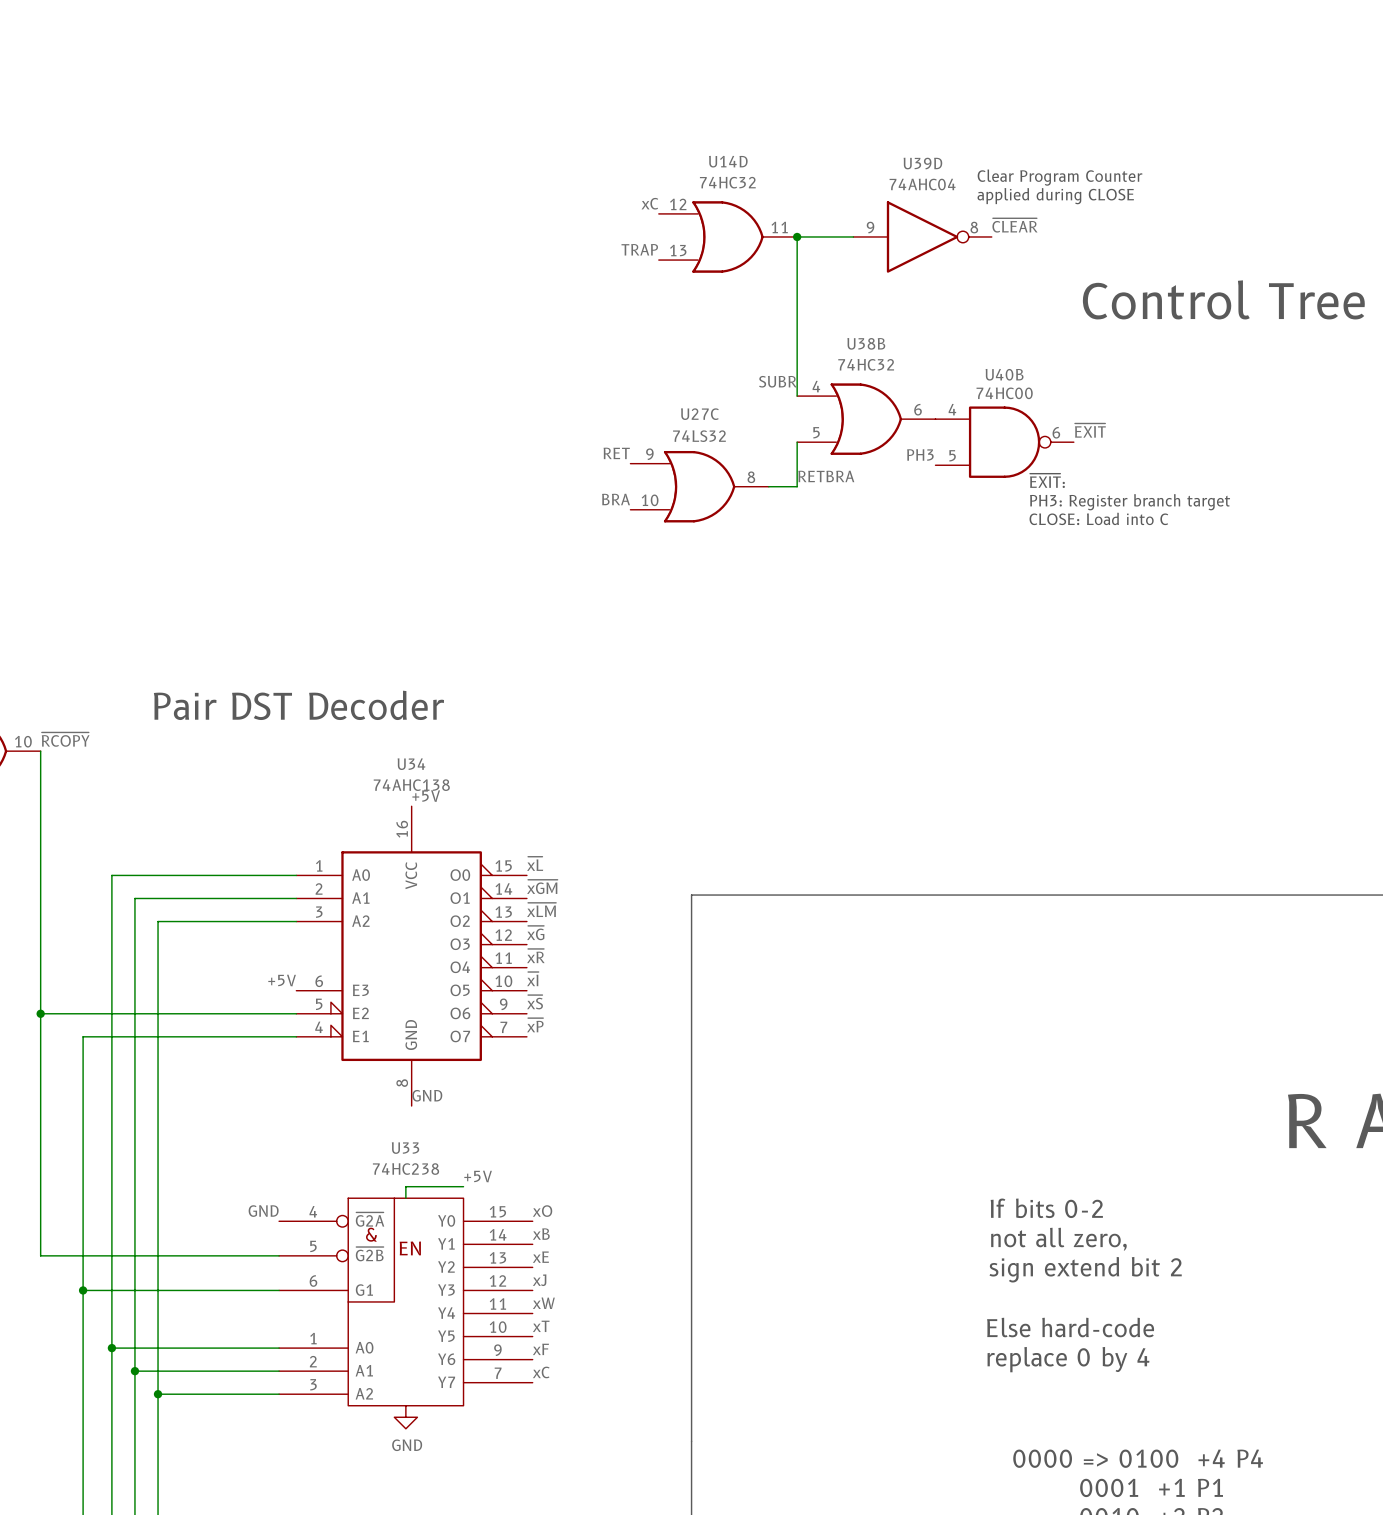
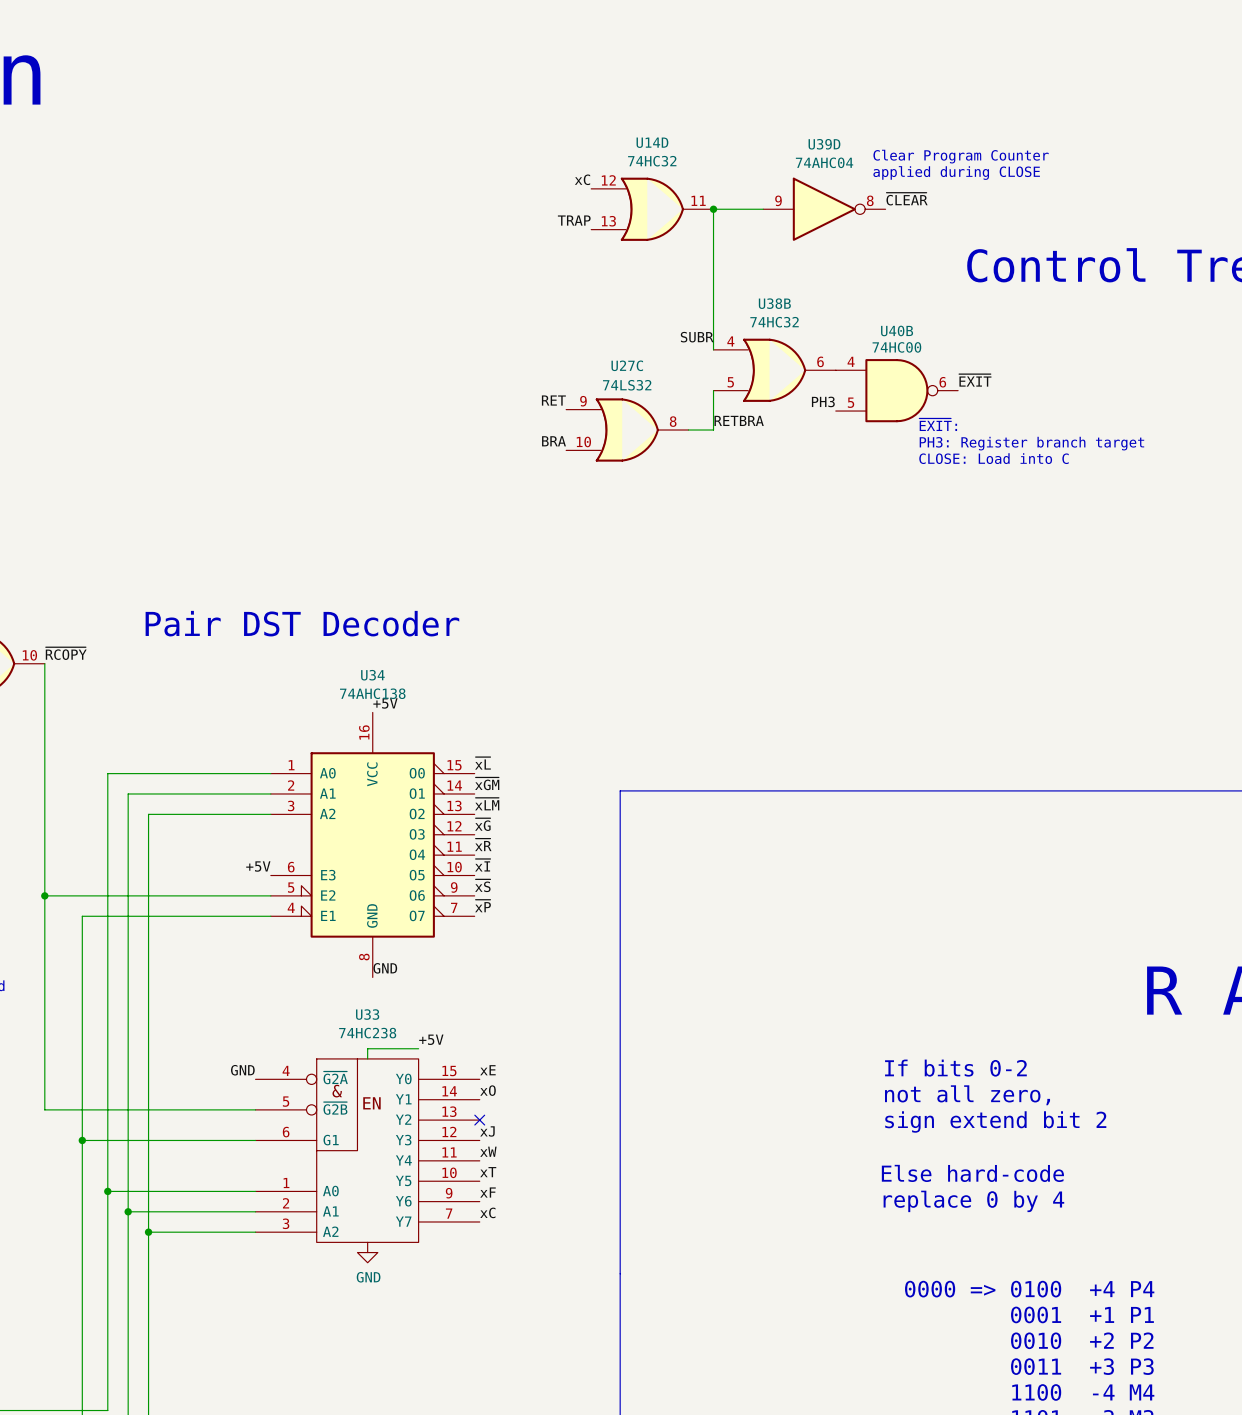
label: xO (542, 1211) -> xE (487, 1070)
label: xB (541, 1234) -> xO (488, 1090)
label: xE (540, 1257) -> none
no-connect mark: none -> (479, 1120)

